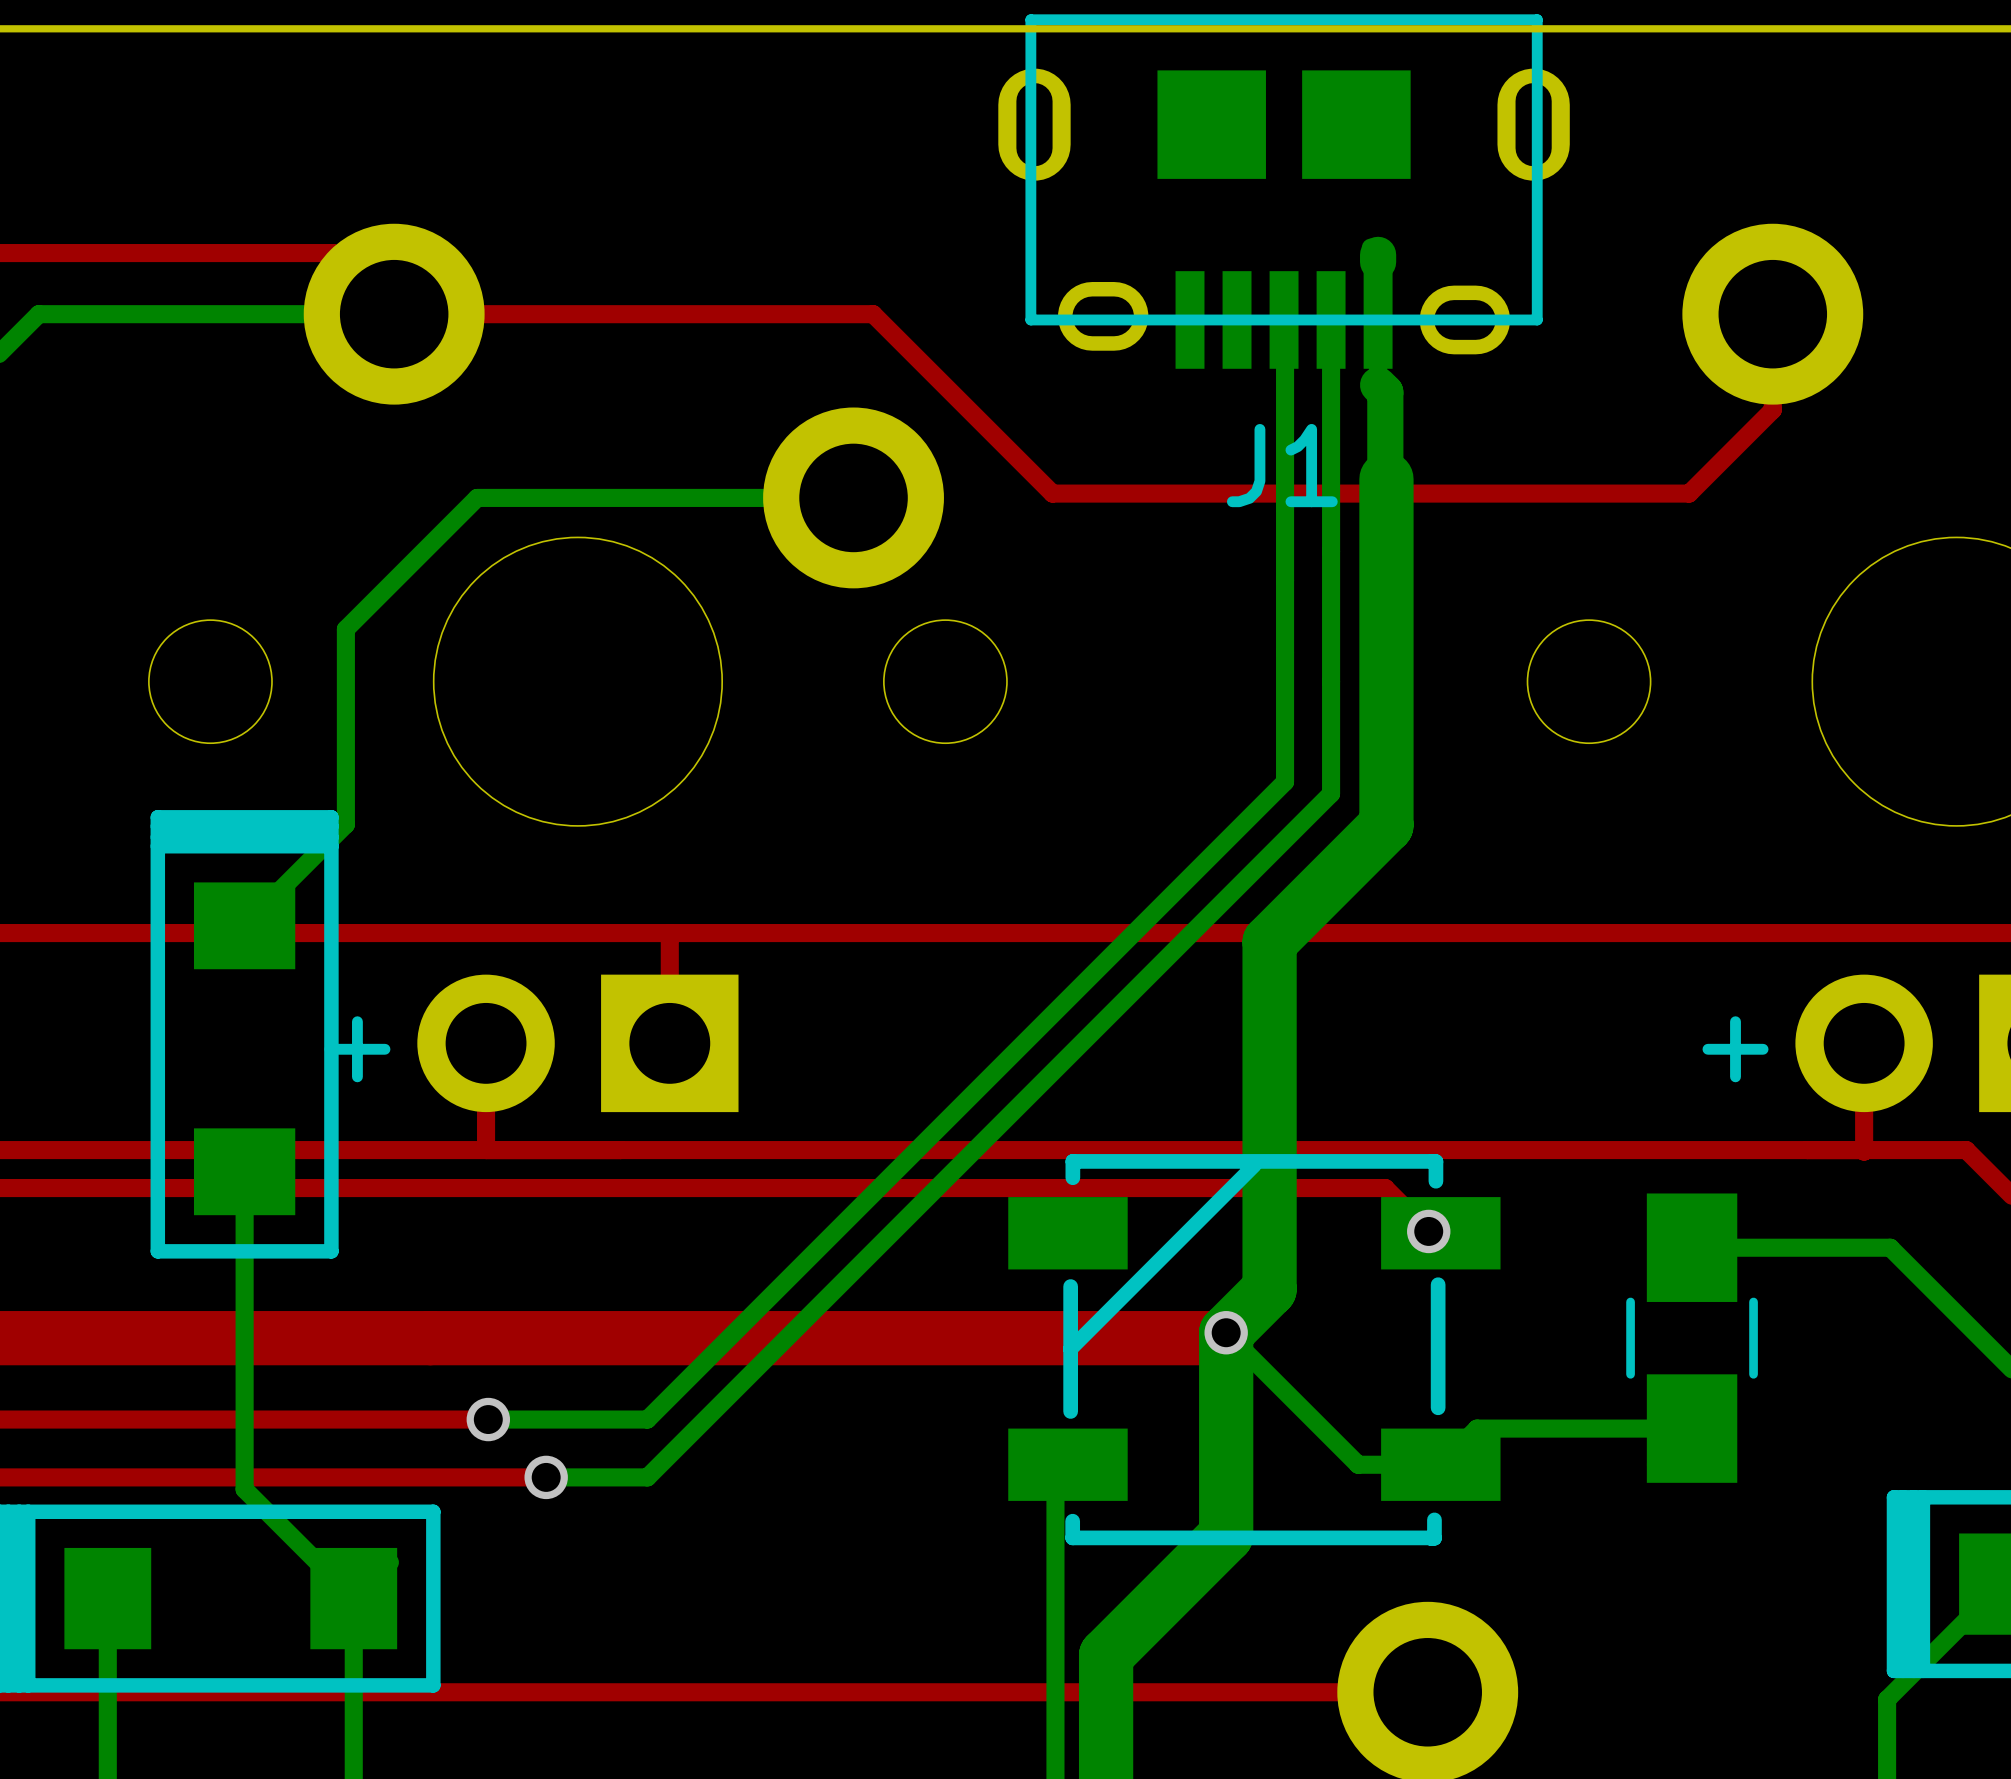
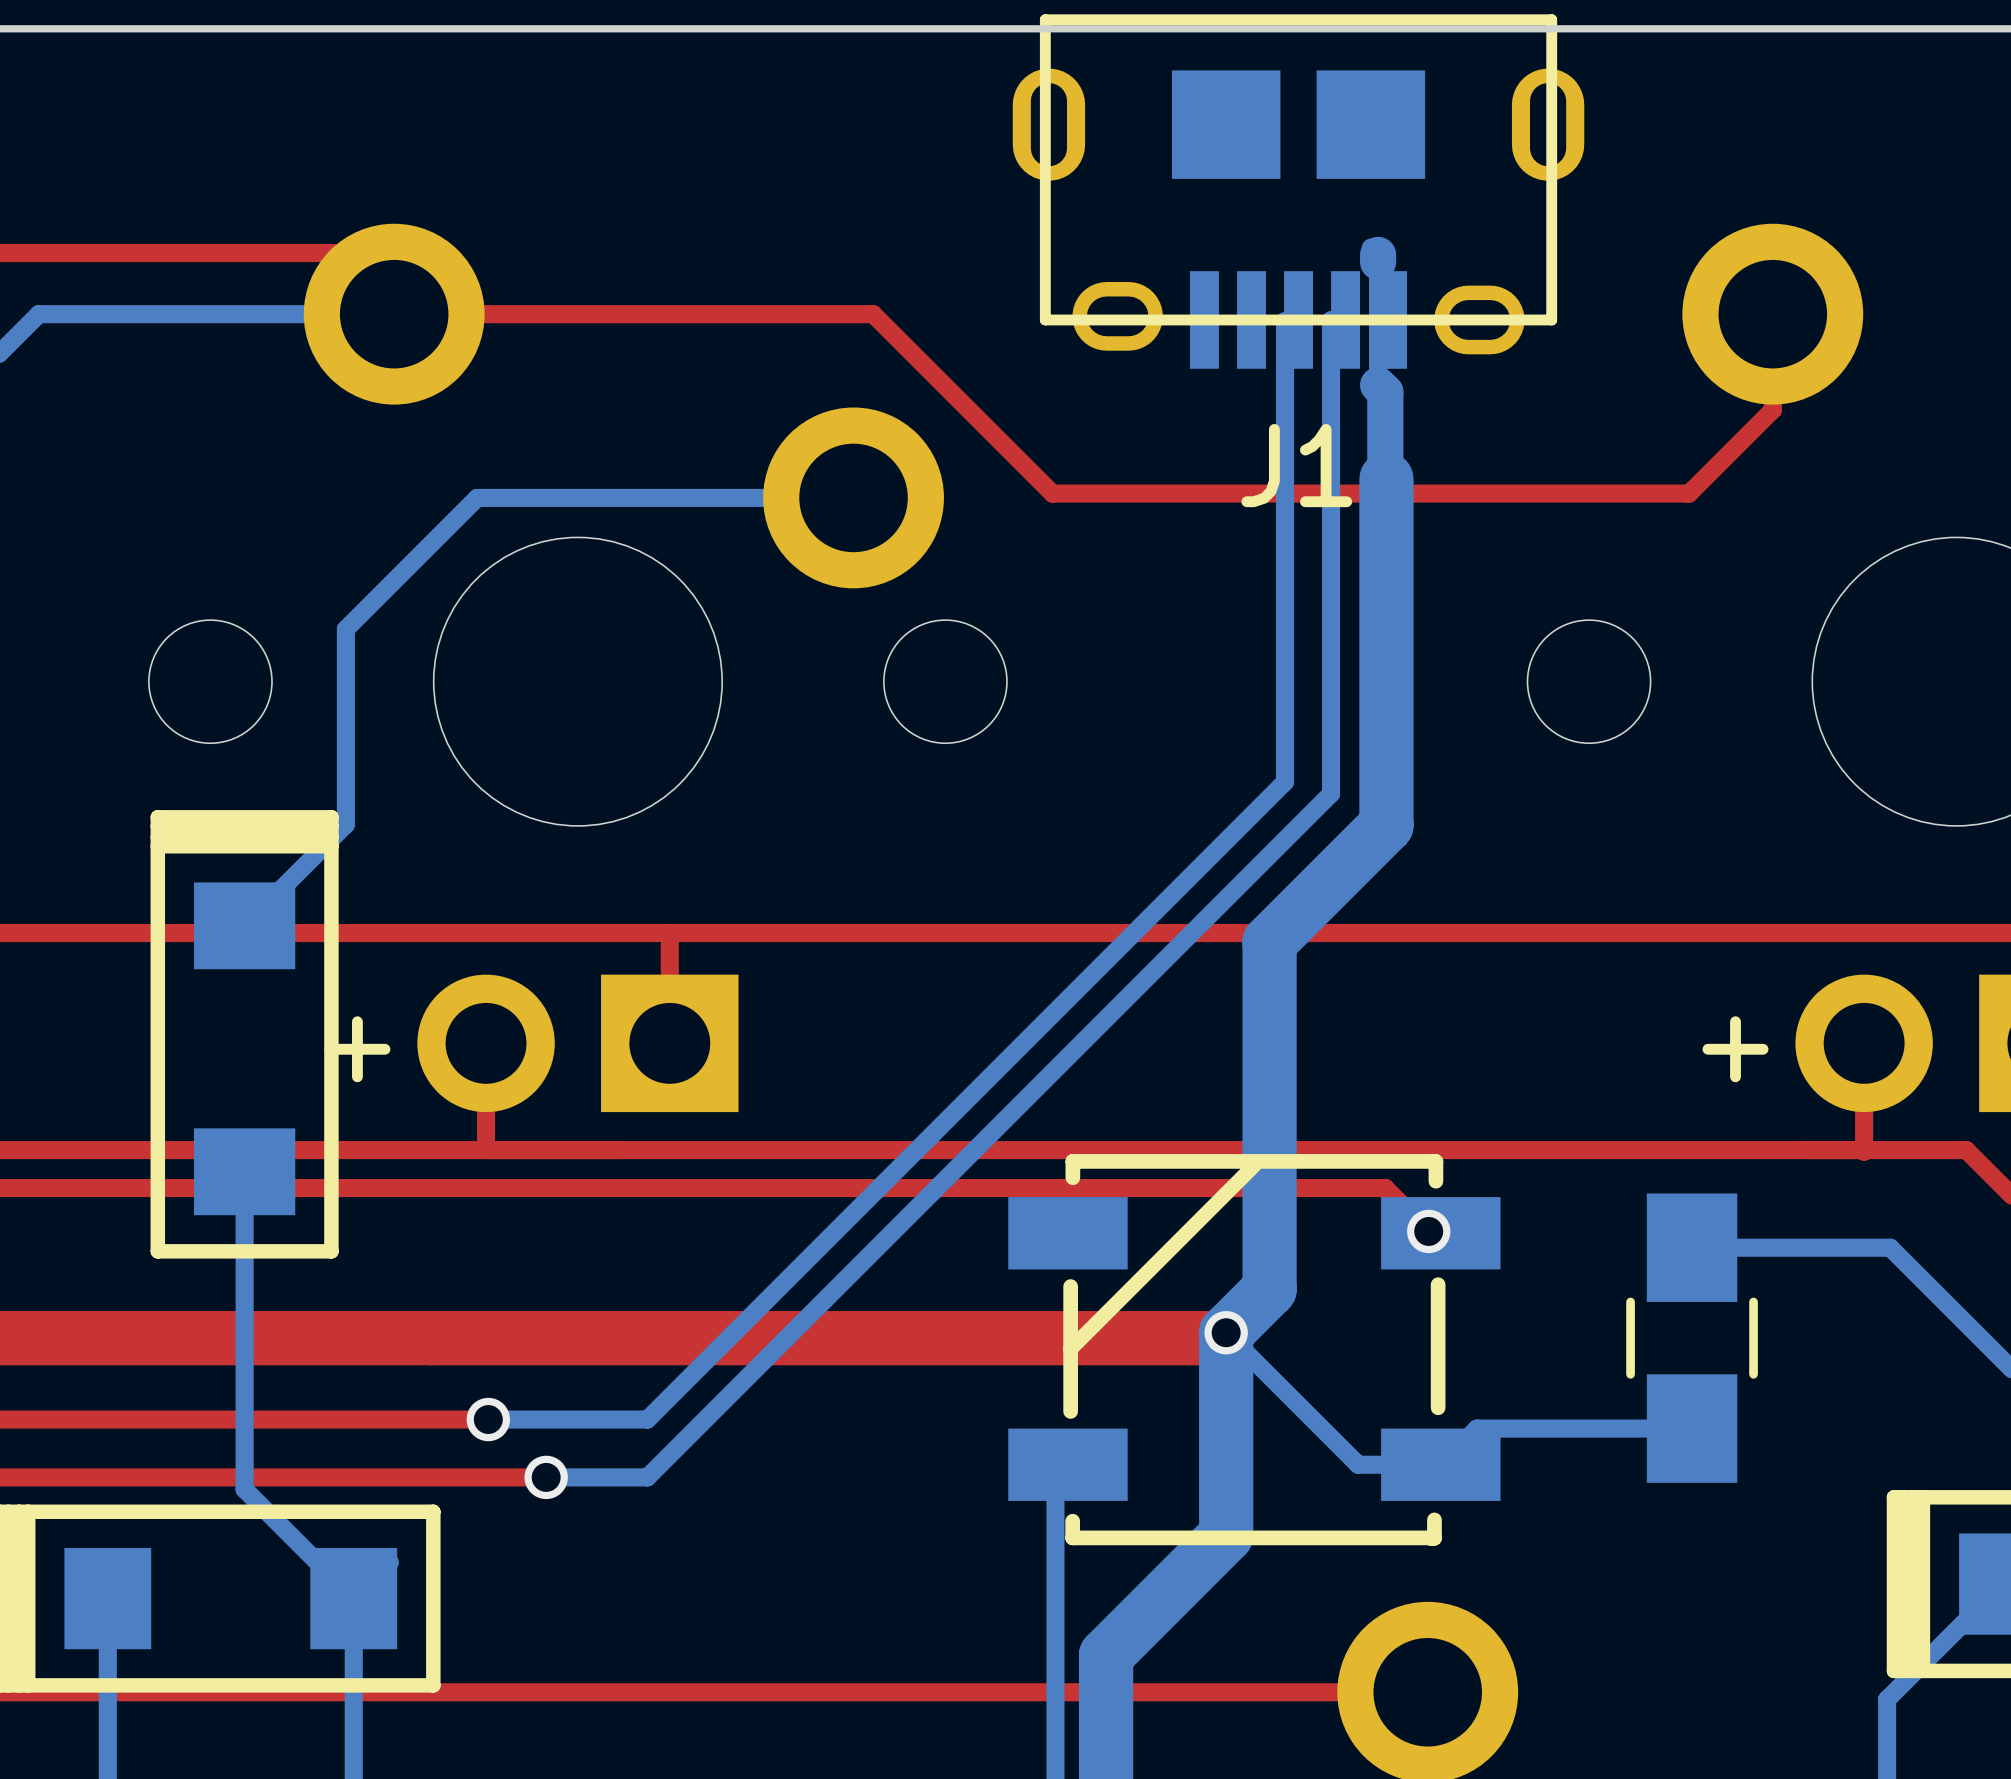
J1 position: (1284, 191) -> (1298, 191)

